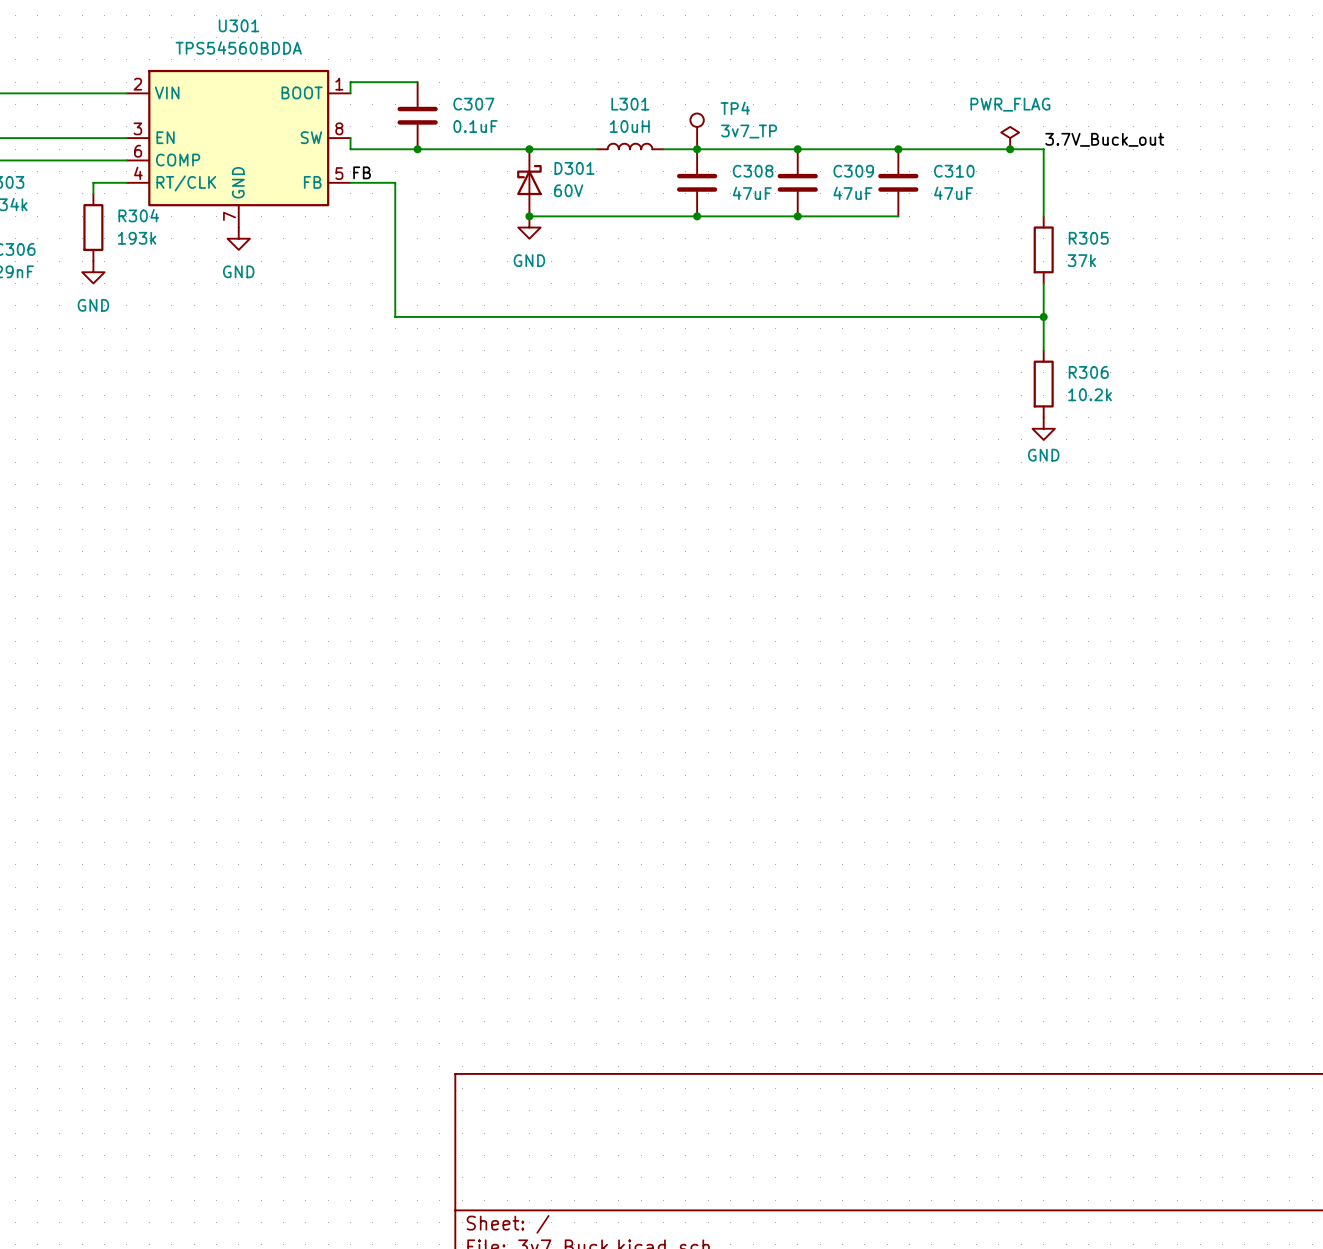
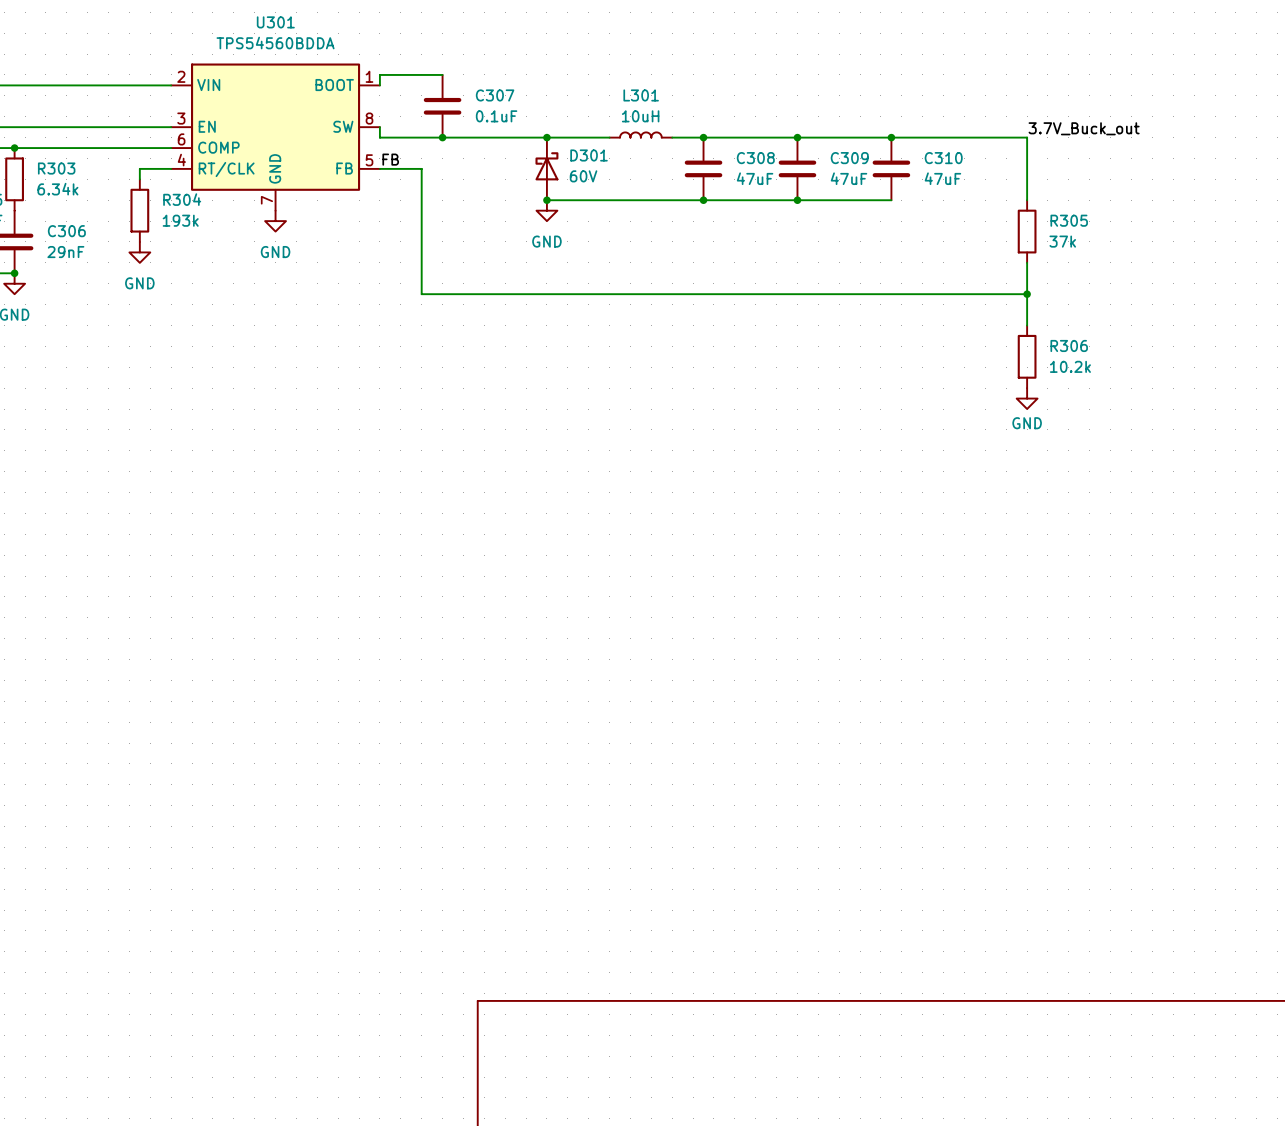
TP4: 3v7_TP (697, 131) -> none
power symbol: PWR_FLAG (1010, 138) -> none
junction: (1010, 149) -> none

